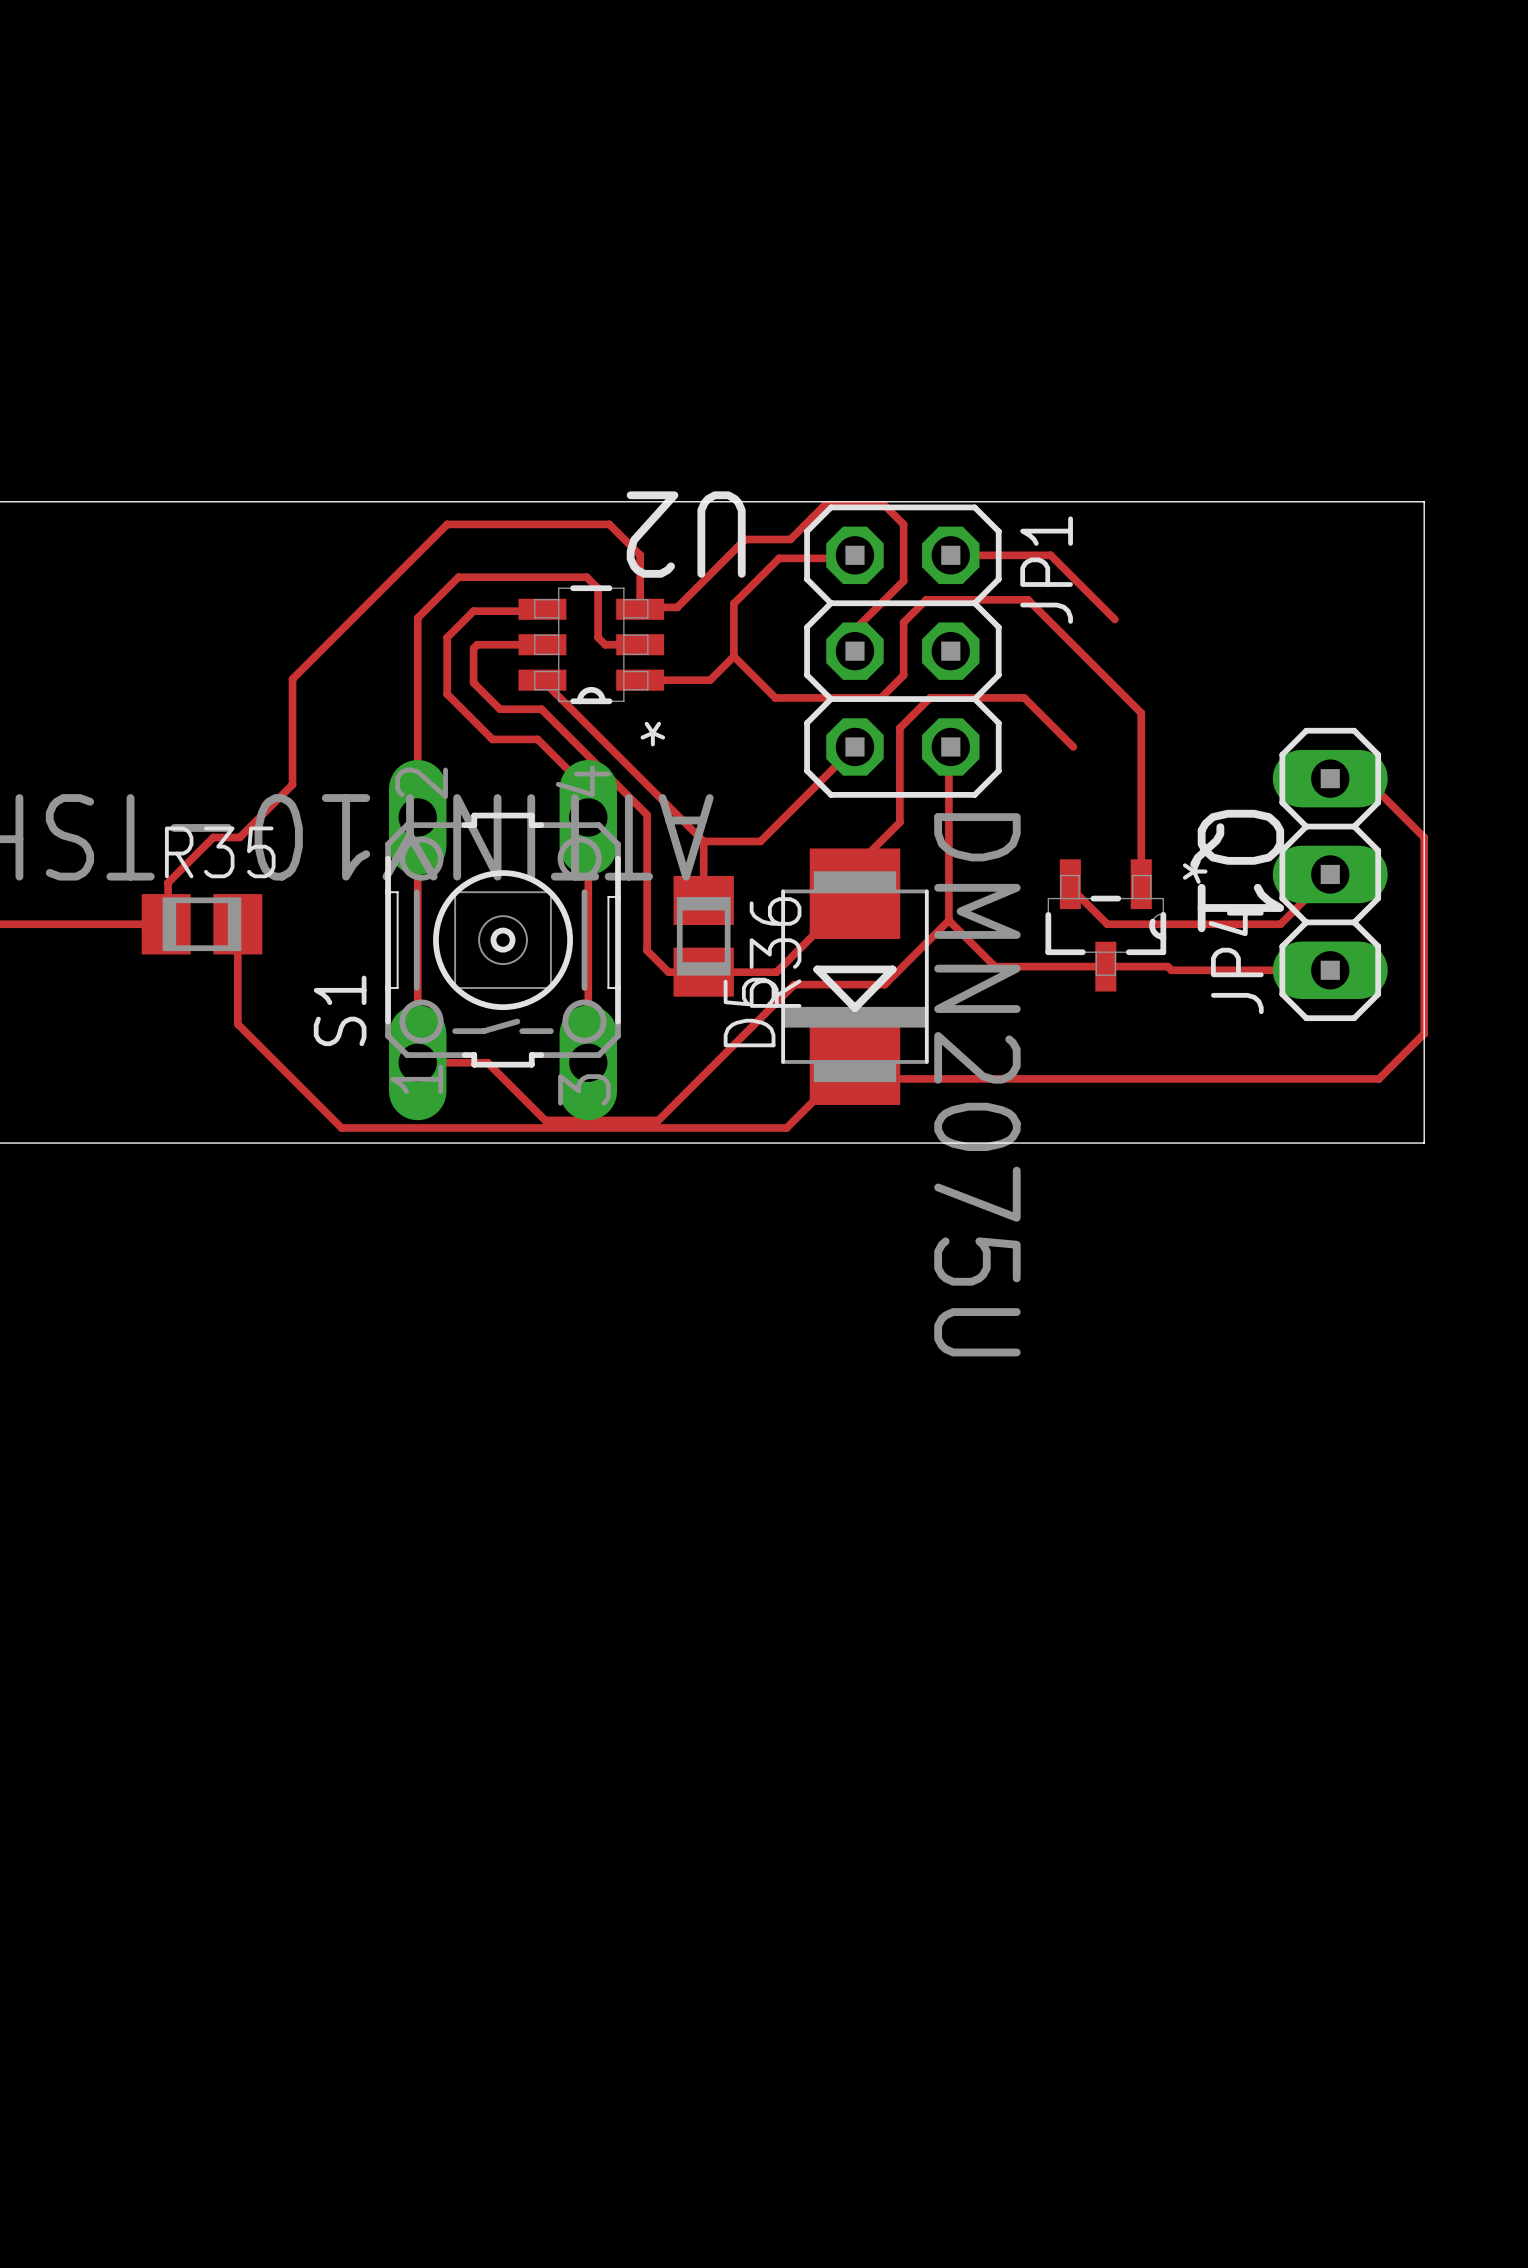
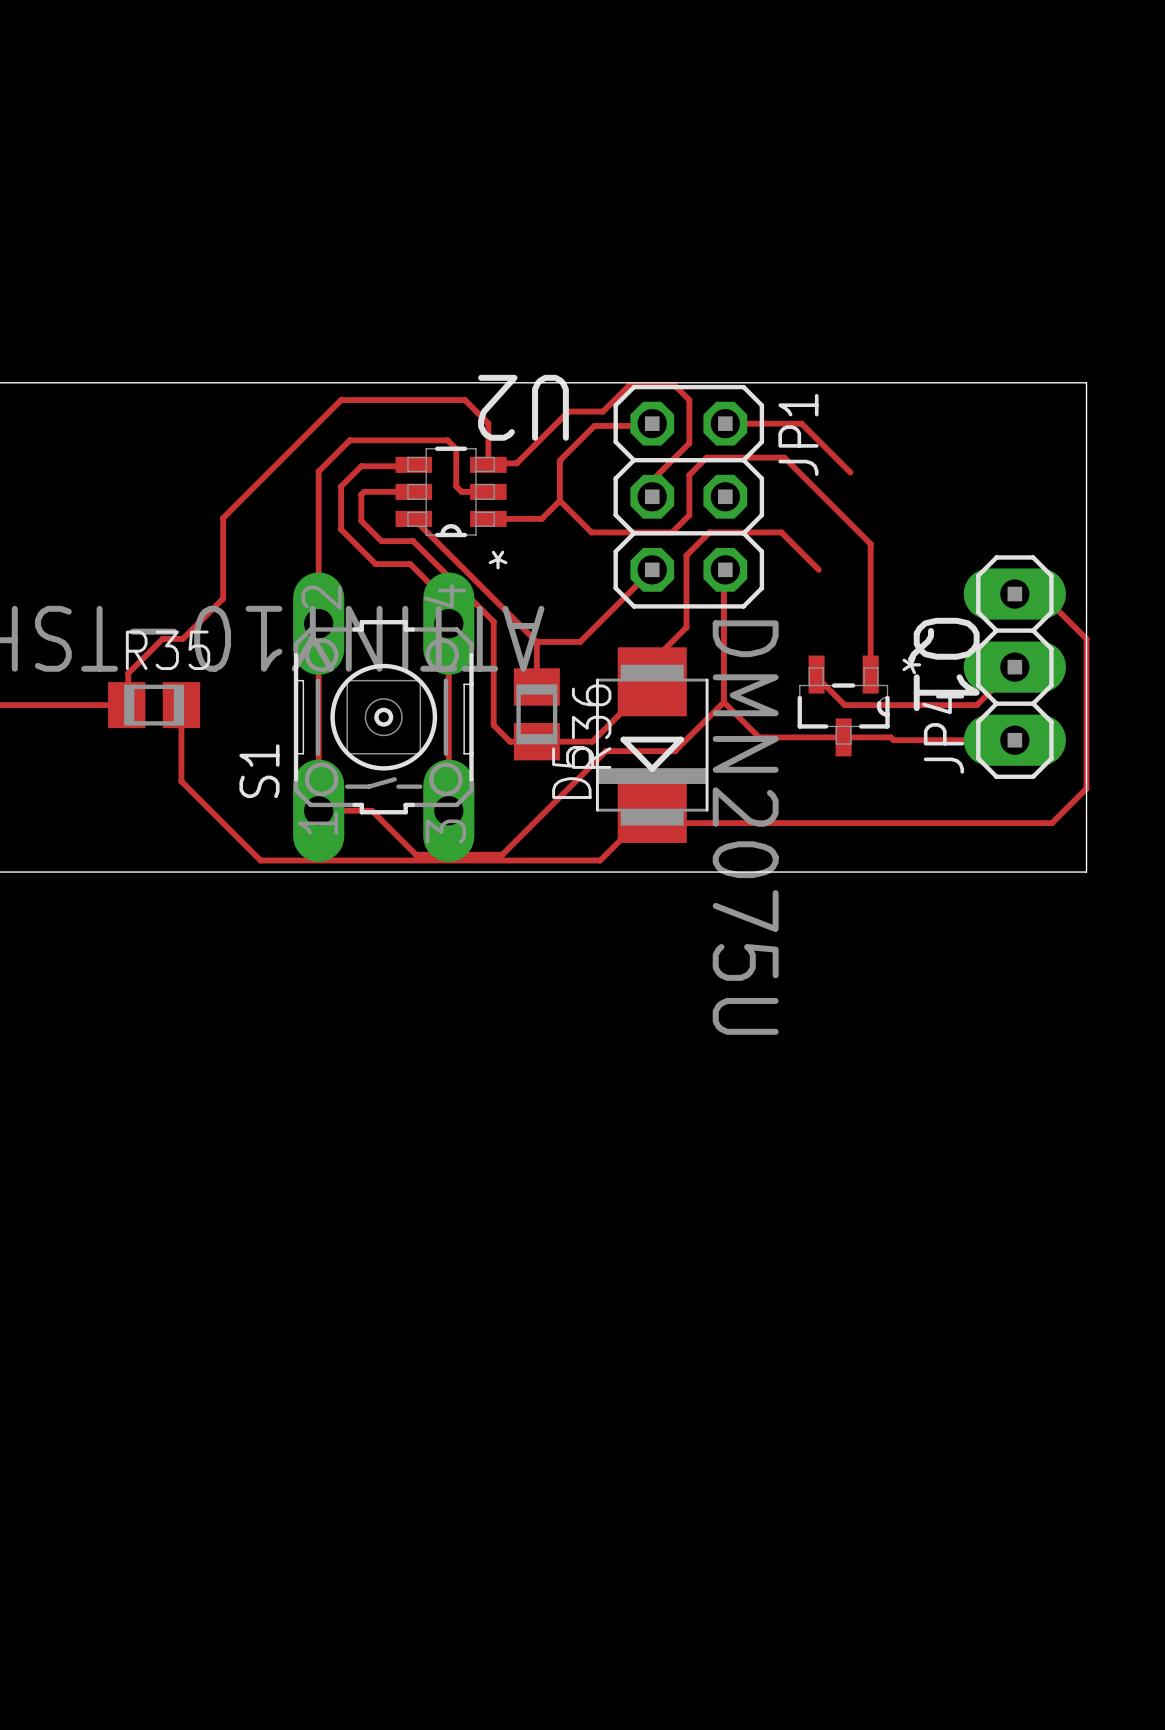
JP4 footprint: [1272, 727, 1388, 1022] -> [963, 555, 1067, 779]
S1 footprint: [385, 759, 621, 1121] -> [293, 572, 475, 862]

